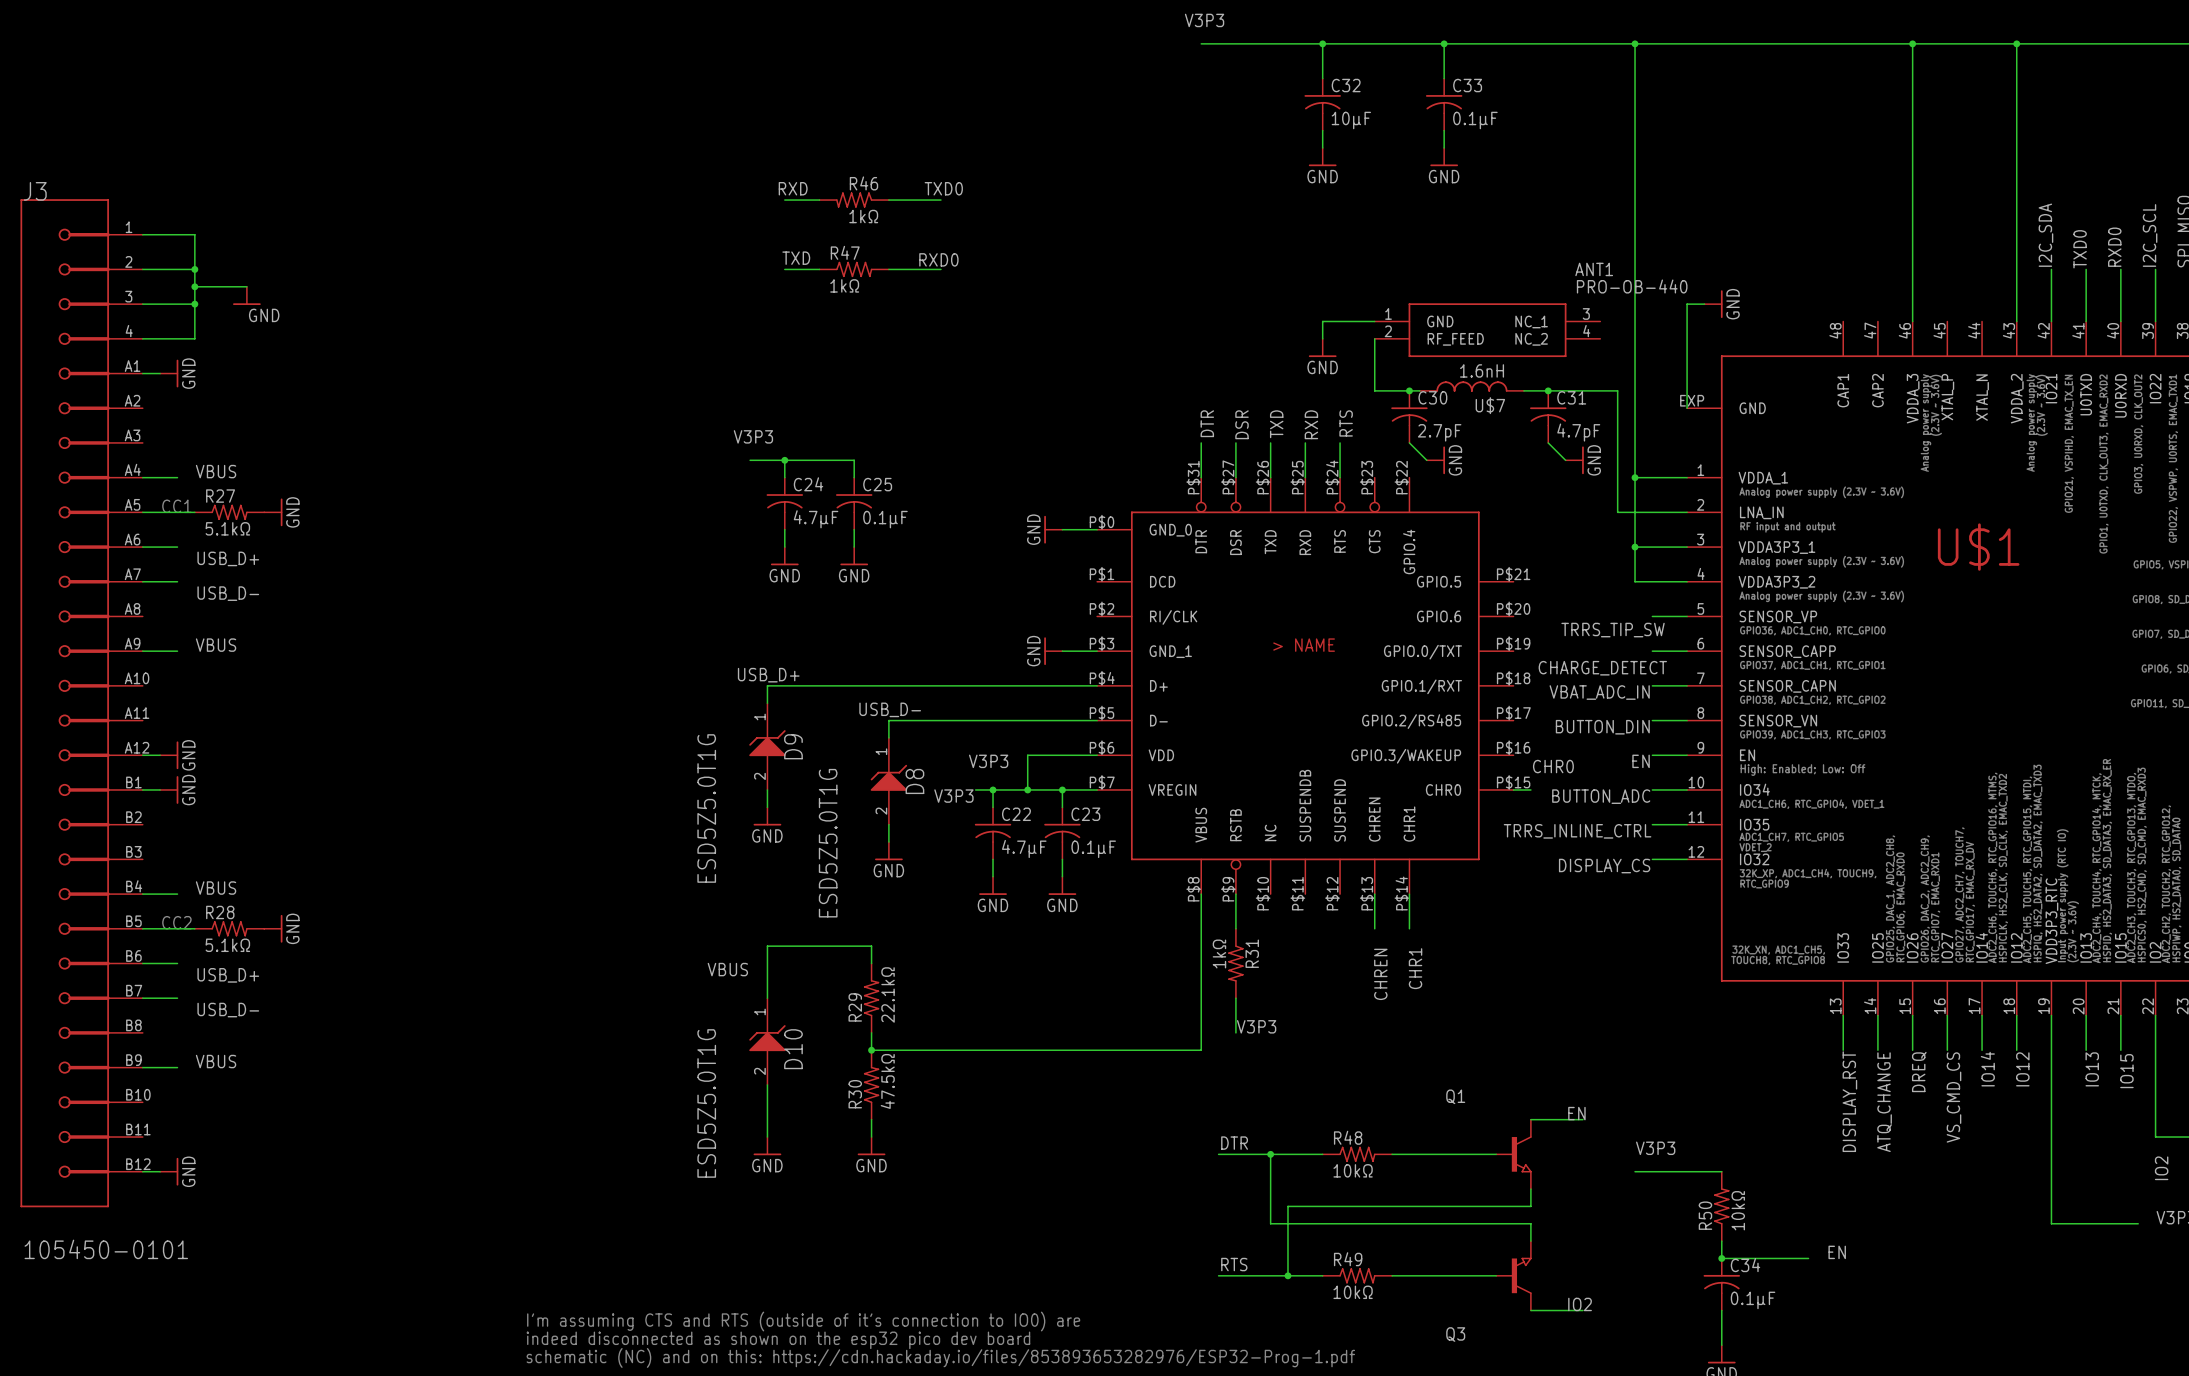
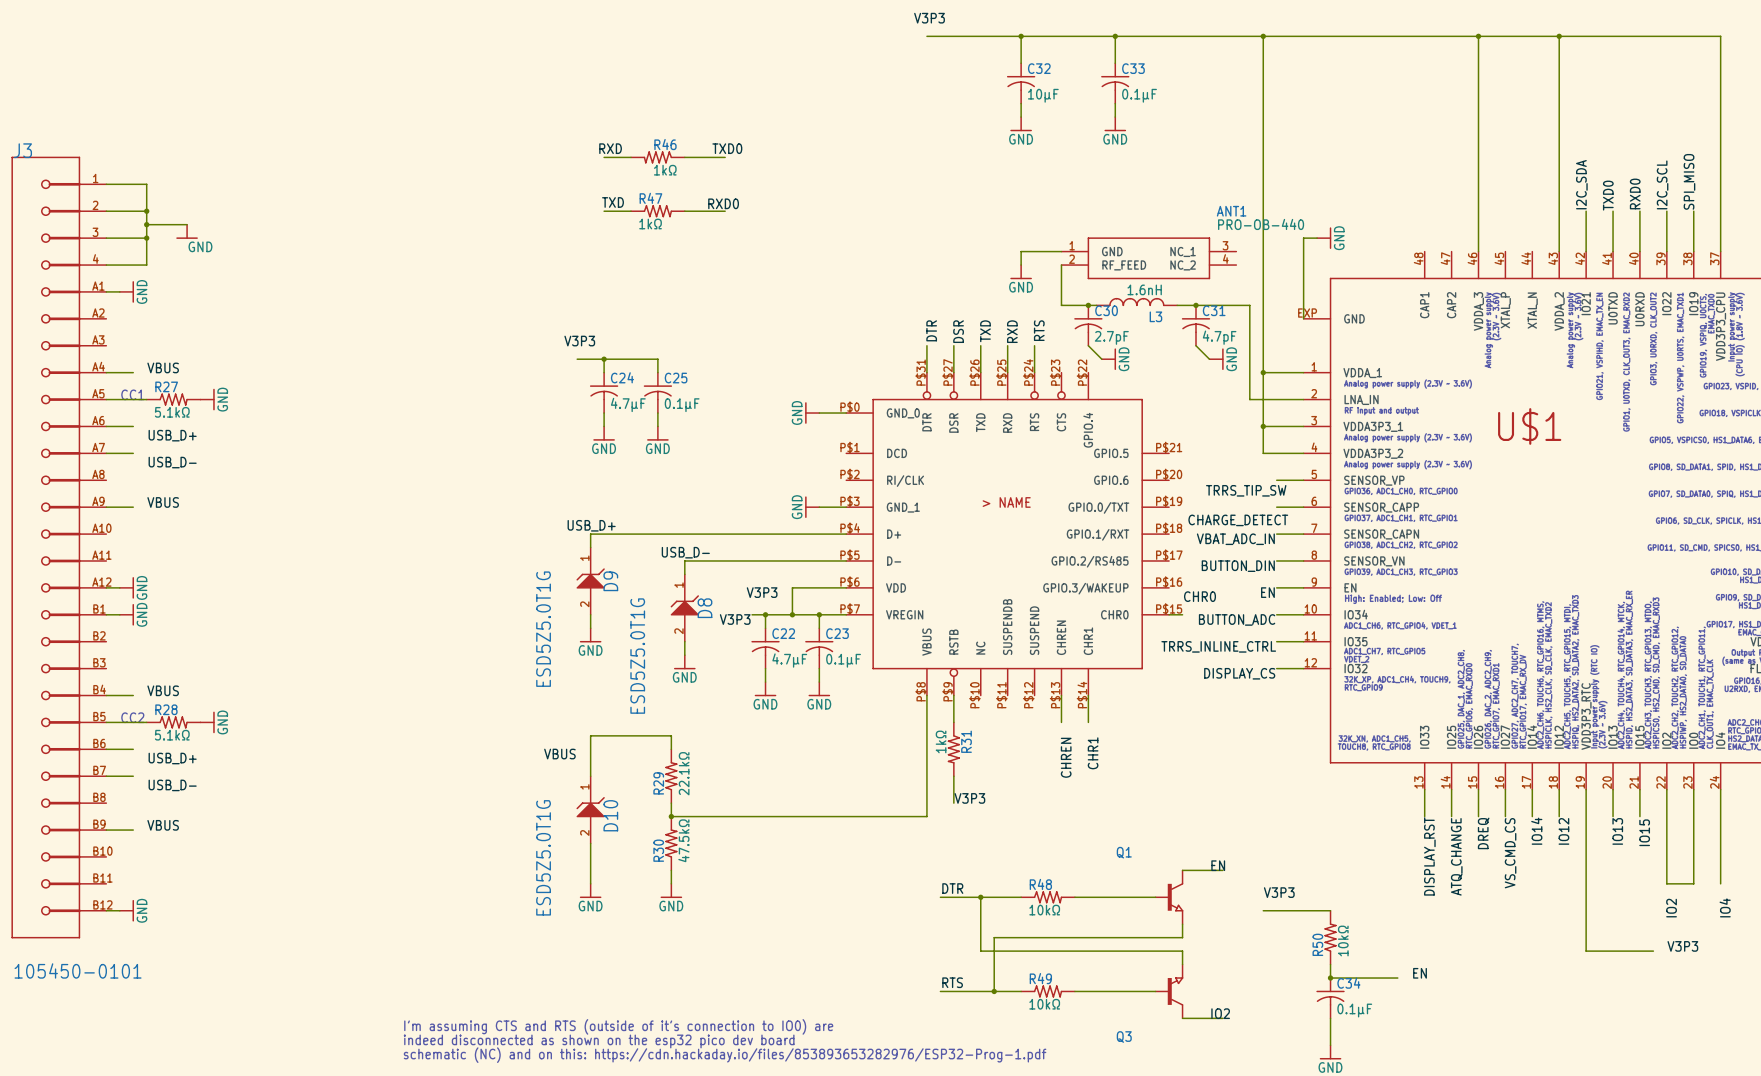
U$7 name: U$7 (1490, 405) -> L3 (1155, 316)

